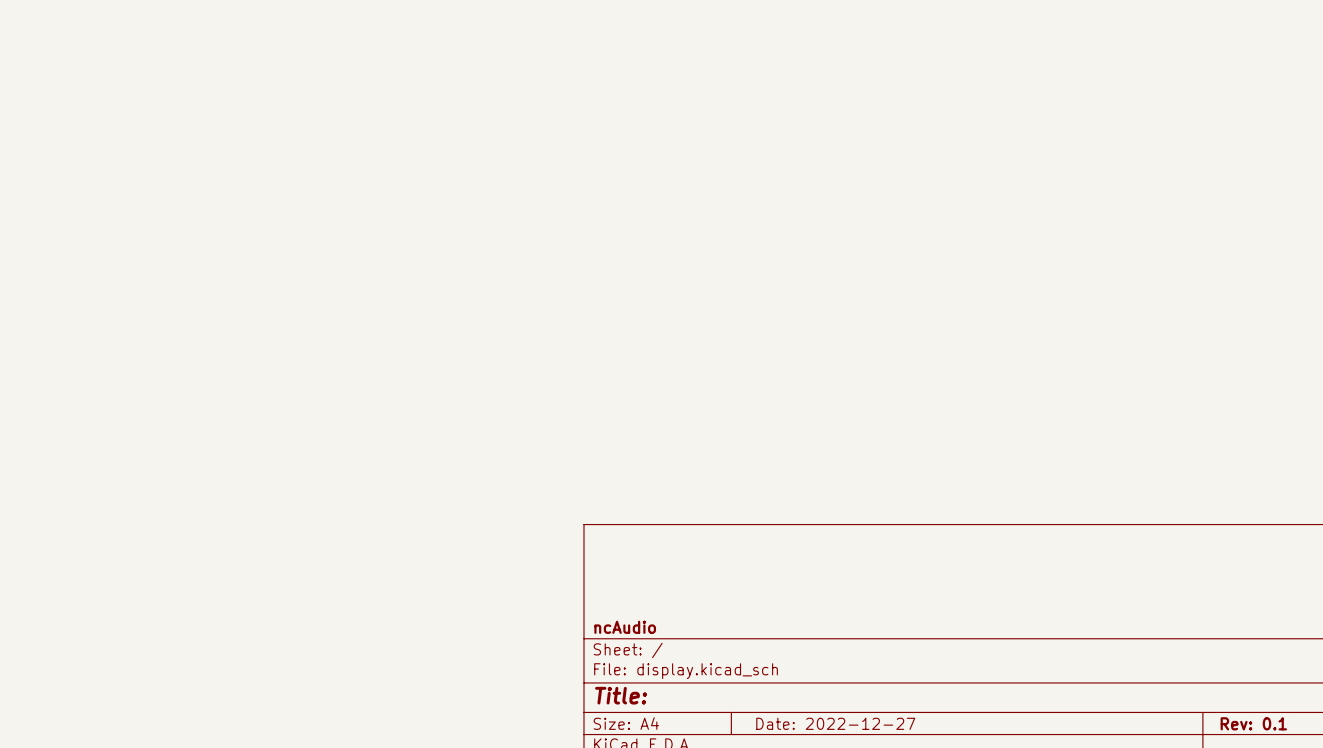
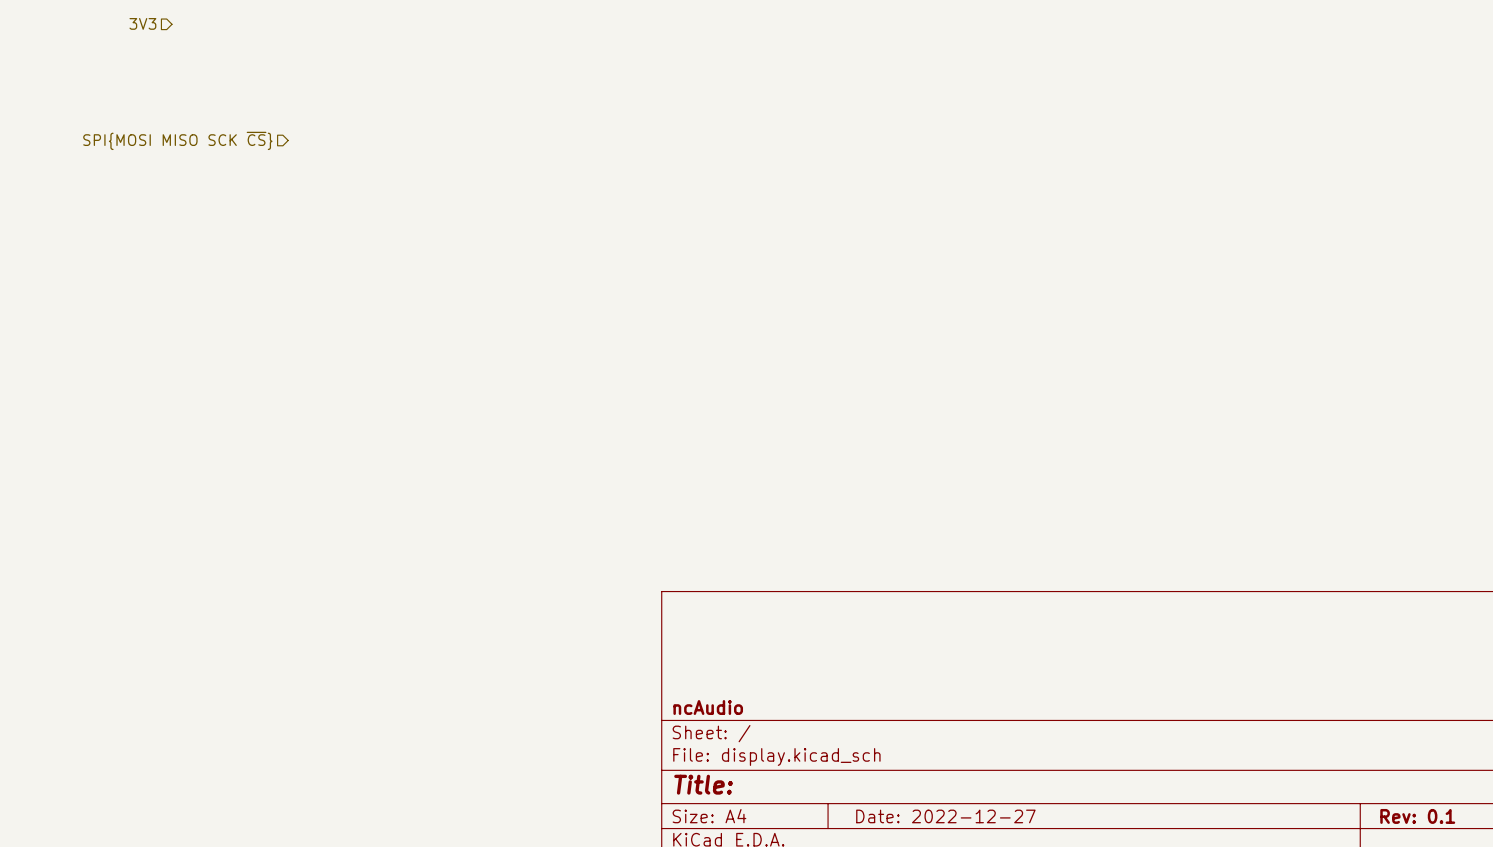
hierarchical label: none -> 3V3 (142, 23)
hierarchical label: none -> SPI{MOSI MISO SCK ~{CS}} (177, 140)

